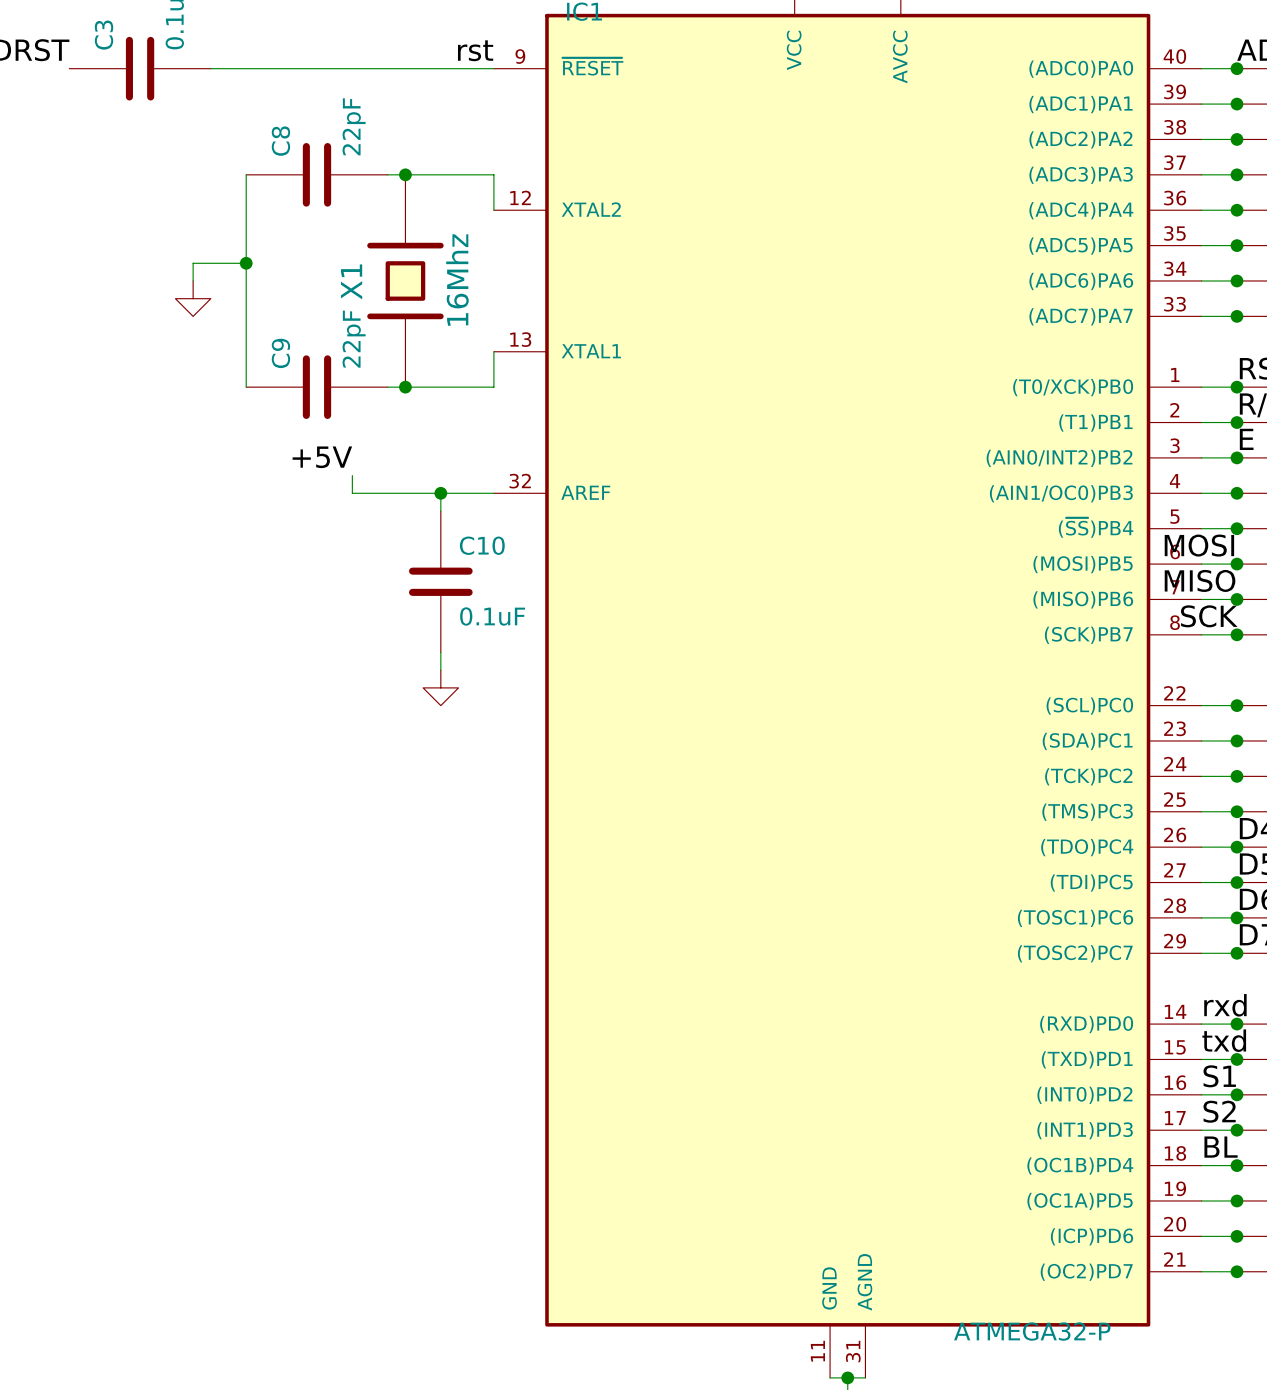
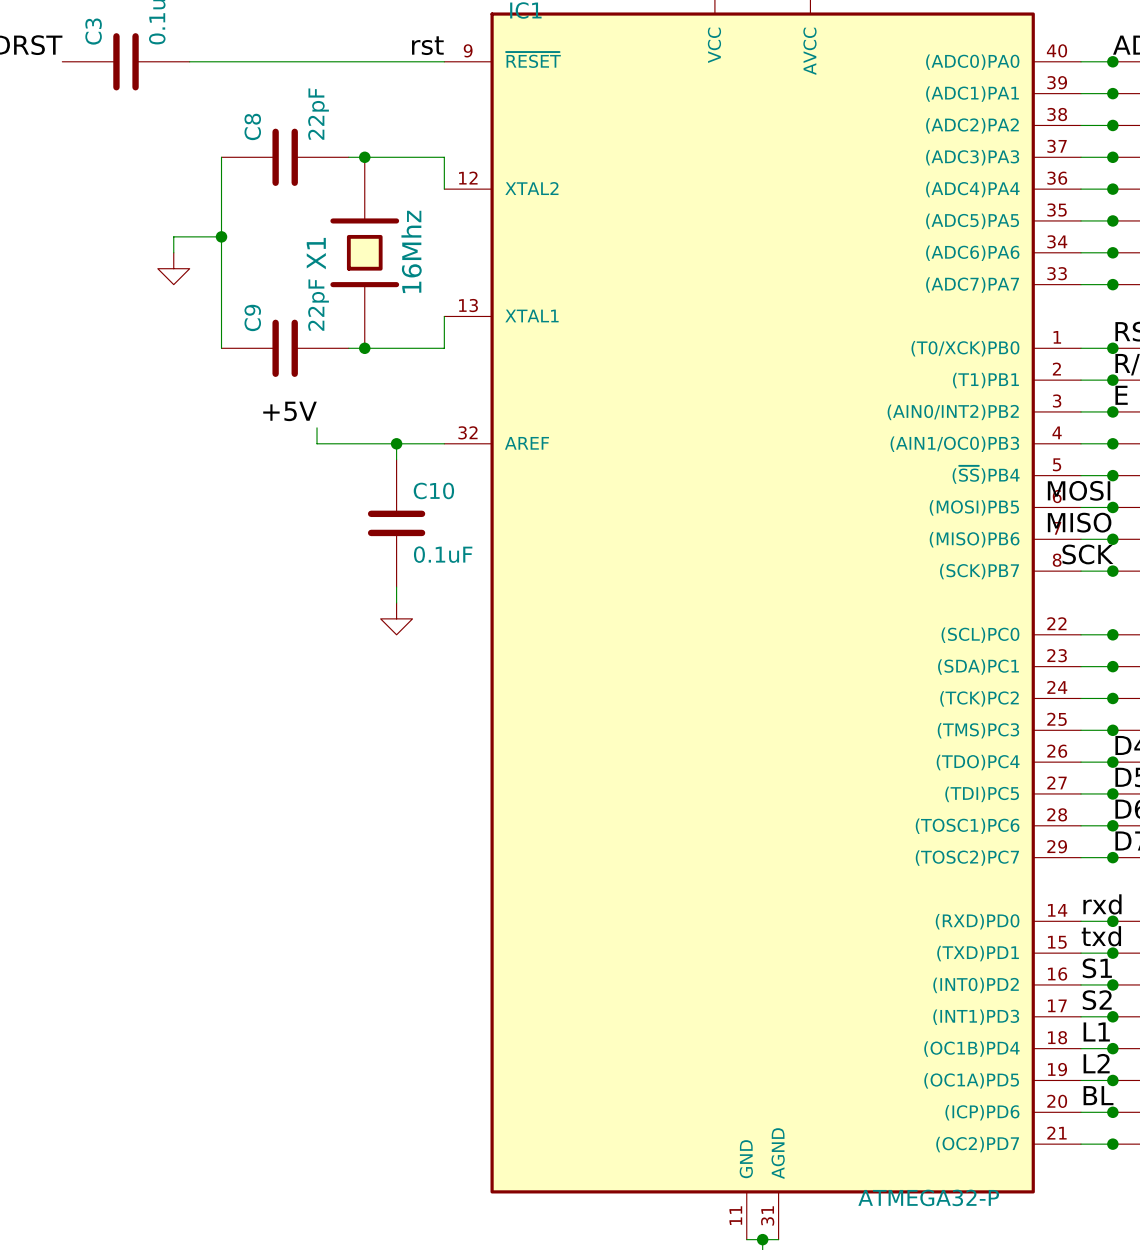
label: BL (1221, 1147) -> L1 (1096, 1031)
label: none -> L2 (1096, 1063)
label: none -> BL (1098, 1095)

